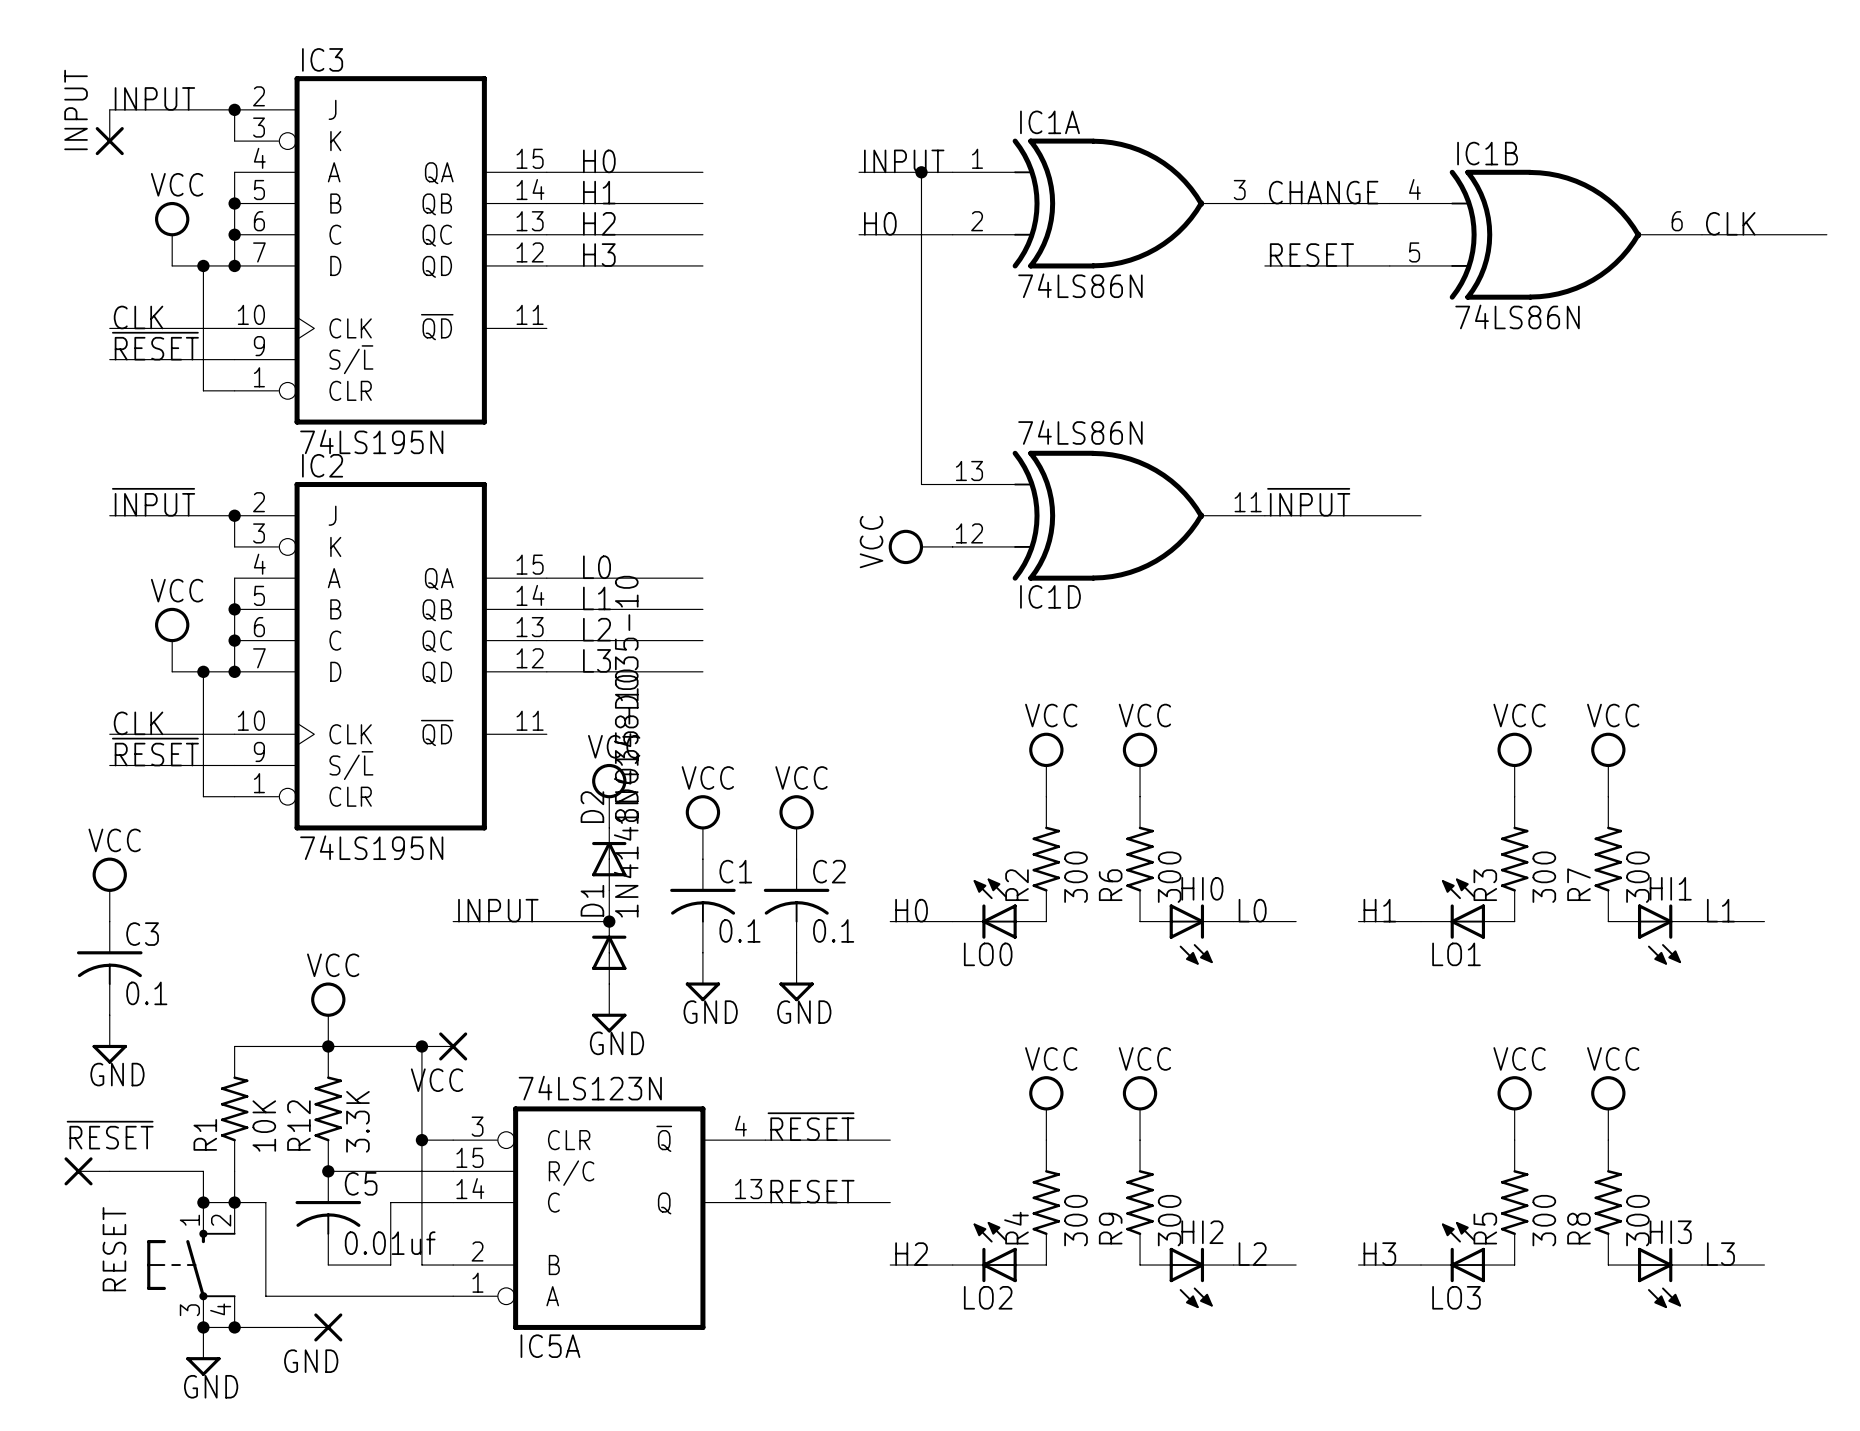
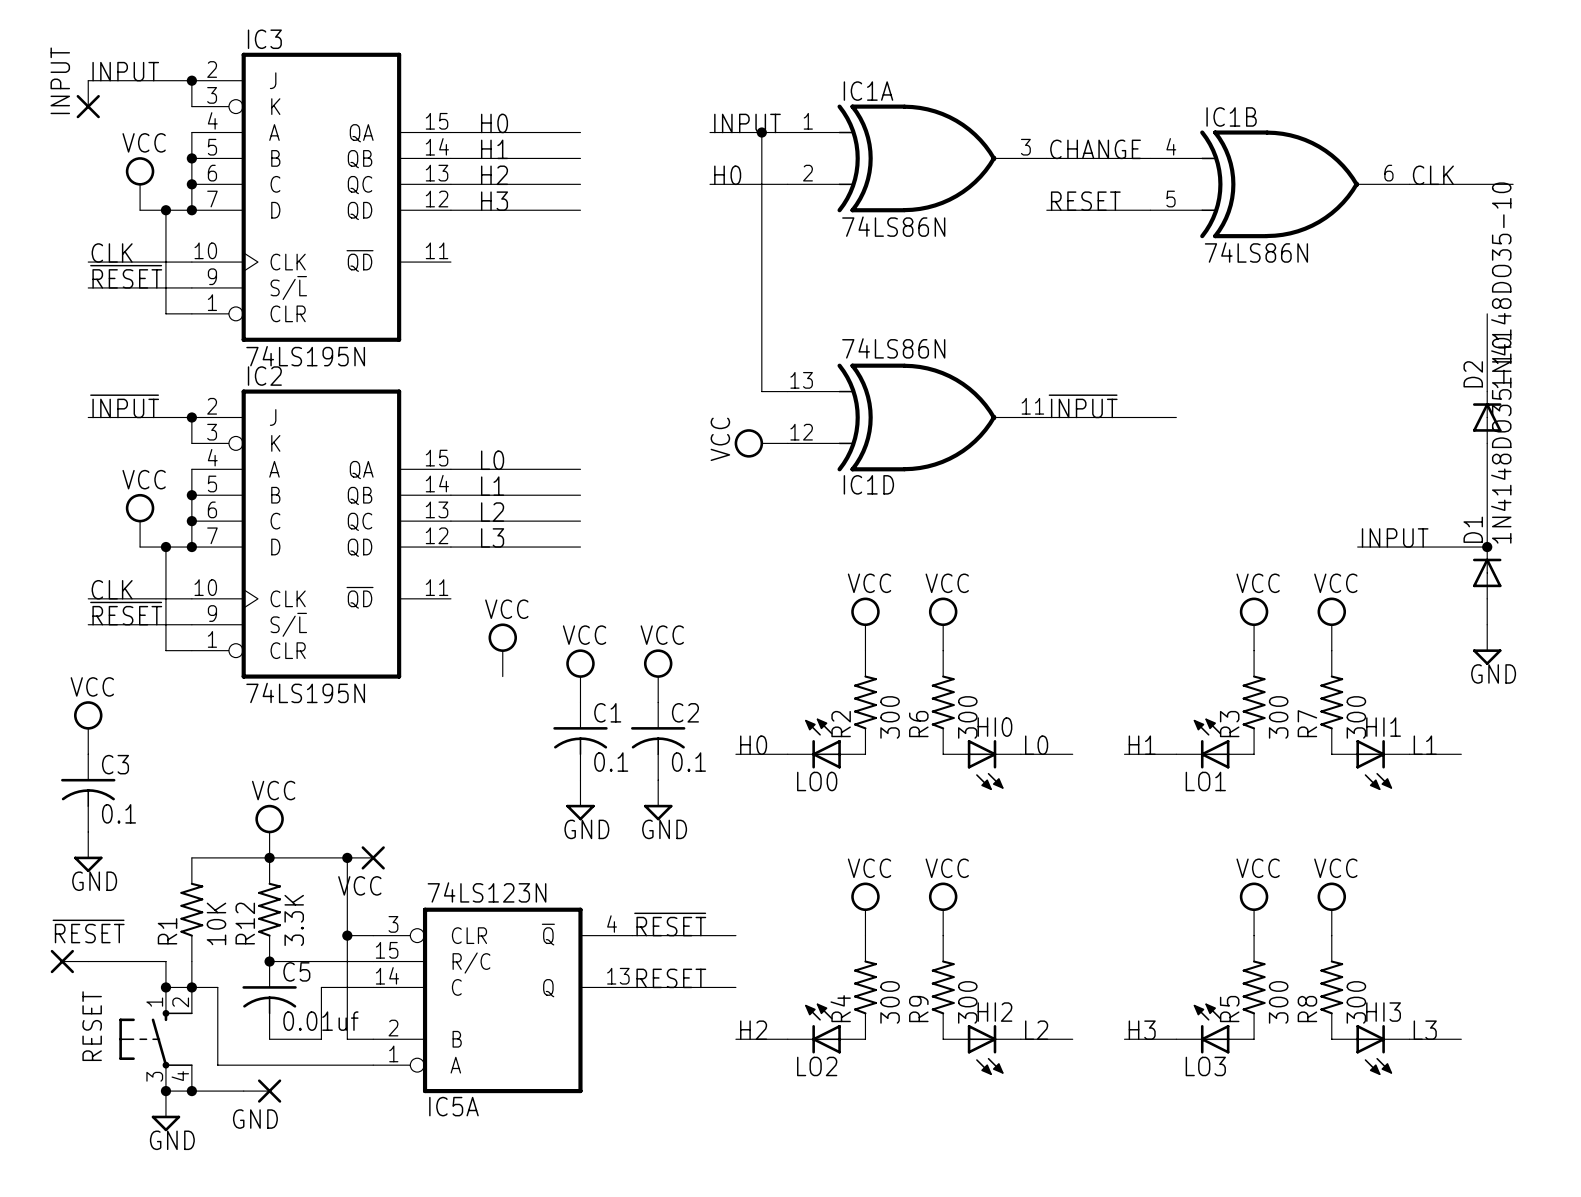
wire: none -> (1487, 313) (1487, 391)
wire: none -> (1487, 443) (1487, 547) (1357, 547)
label: none -> INPUT (1395, 537)
junction: none -> (1487, 547)
wire: none -> (1487, 598) (1487, 624)
power symbol: none -> GND (1487, 644)
D2 position: (609, 859) -> (1487, 417)
wire: (609, 890) (609, 921) (453, 921) -> none
label: INPUT (498, 910) -> none
junction: (609, 921) -> none
D1 position: (609, 952) -> (1487, 572)
power symbol: GND (609, 1008) -> none

